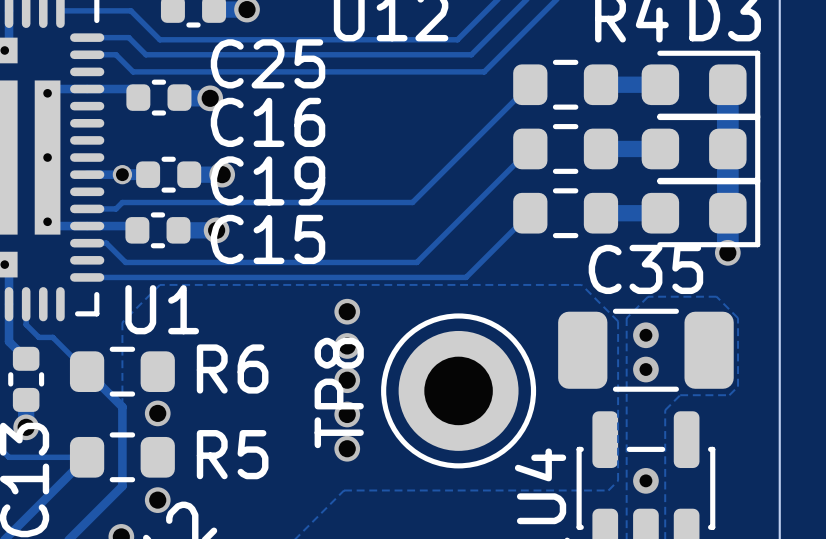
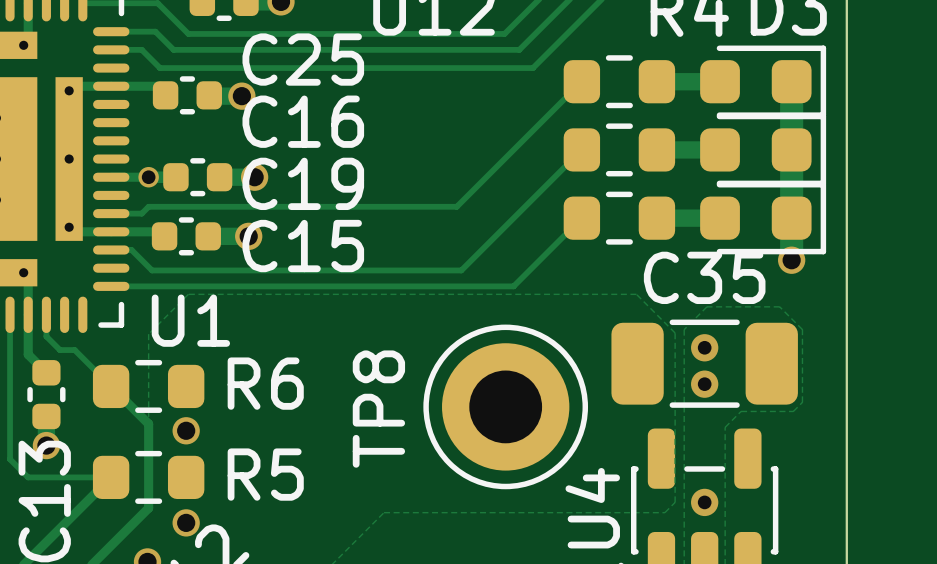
via: (347, 311) -> none
via: (347, 345) -> none
via: (347, 380) -> none
via: (347, 414) -> none
via: (347, 448) -> none

